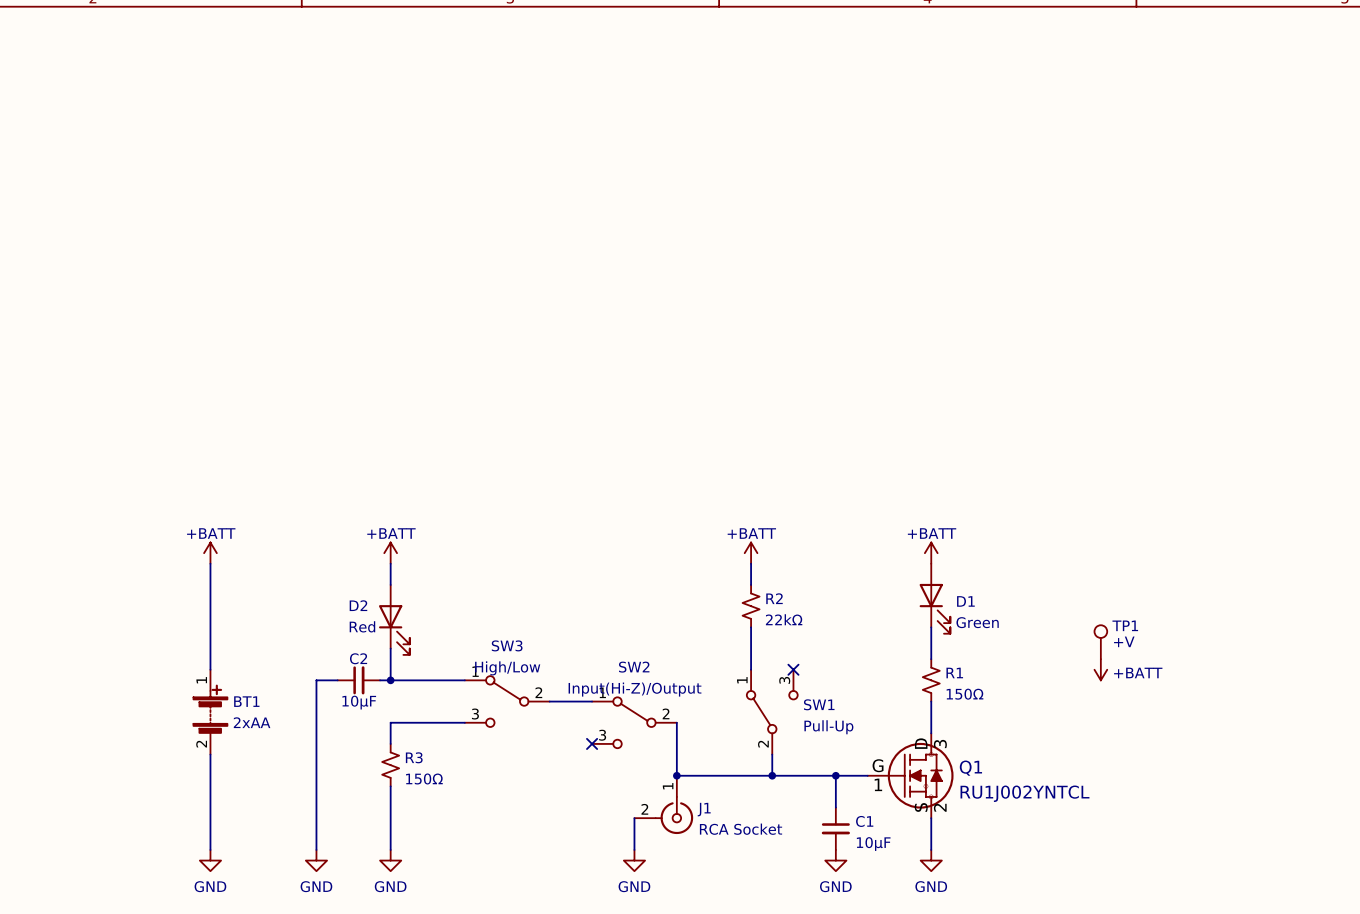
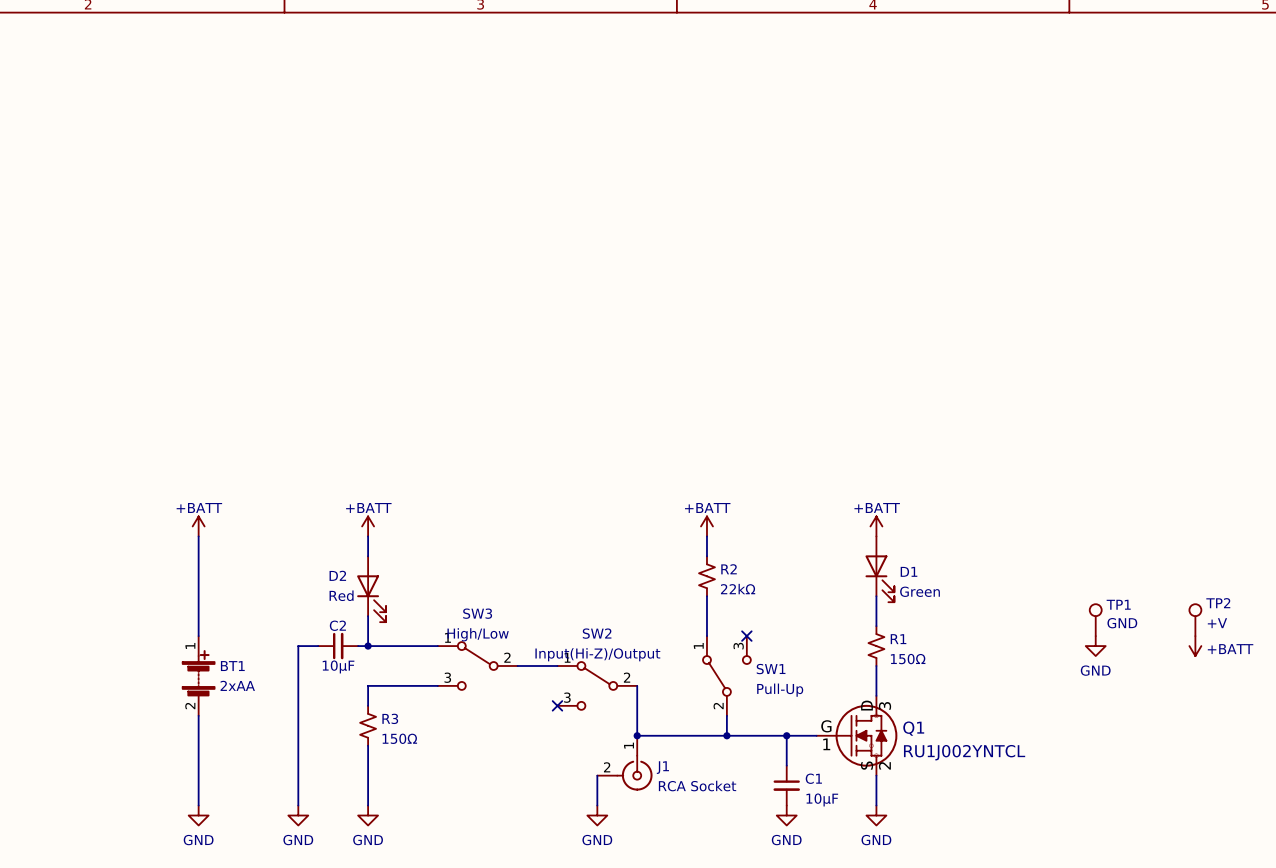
TP1 value: +V (1124, 641) -> GND (1122, 623)
TP1 position: (1100, 642) -> (1095, 620)
TP2: none -> +V (1195, 620)
power symbol position: +BATT (1100, 669) -> +BATT (1195, 646)
power symbol: none -> GND (1095, 646)

